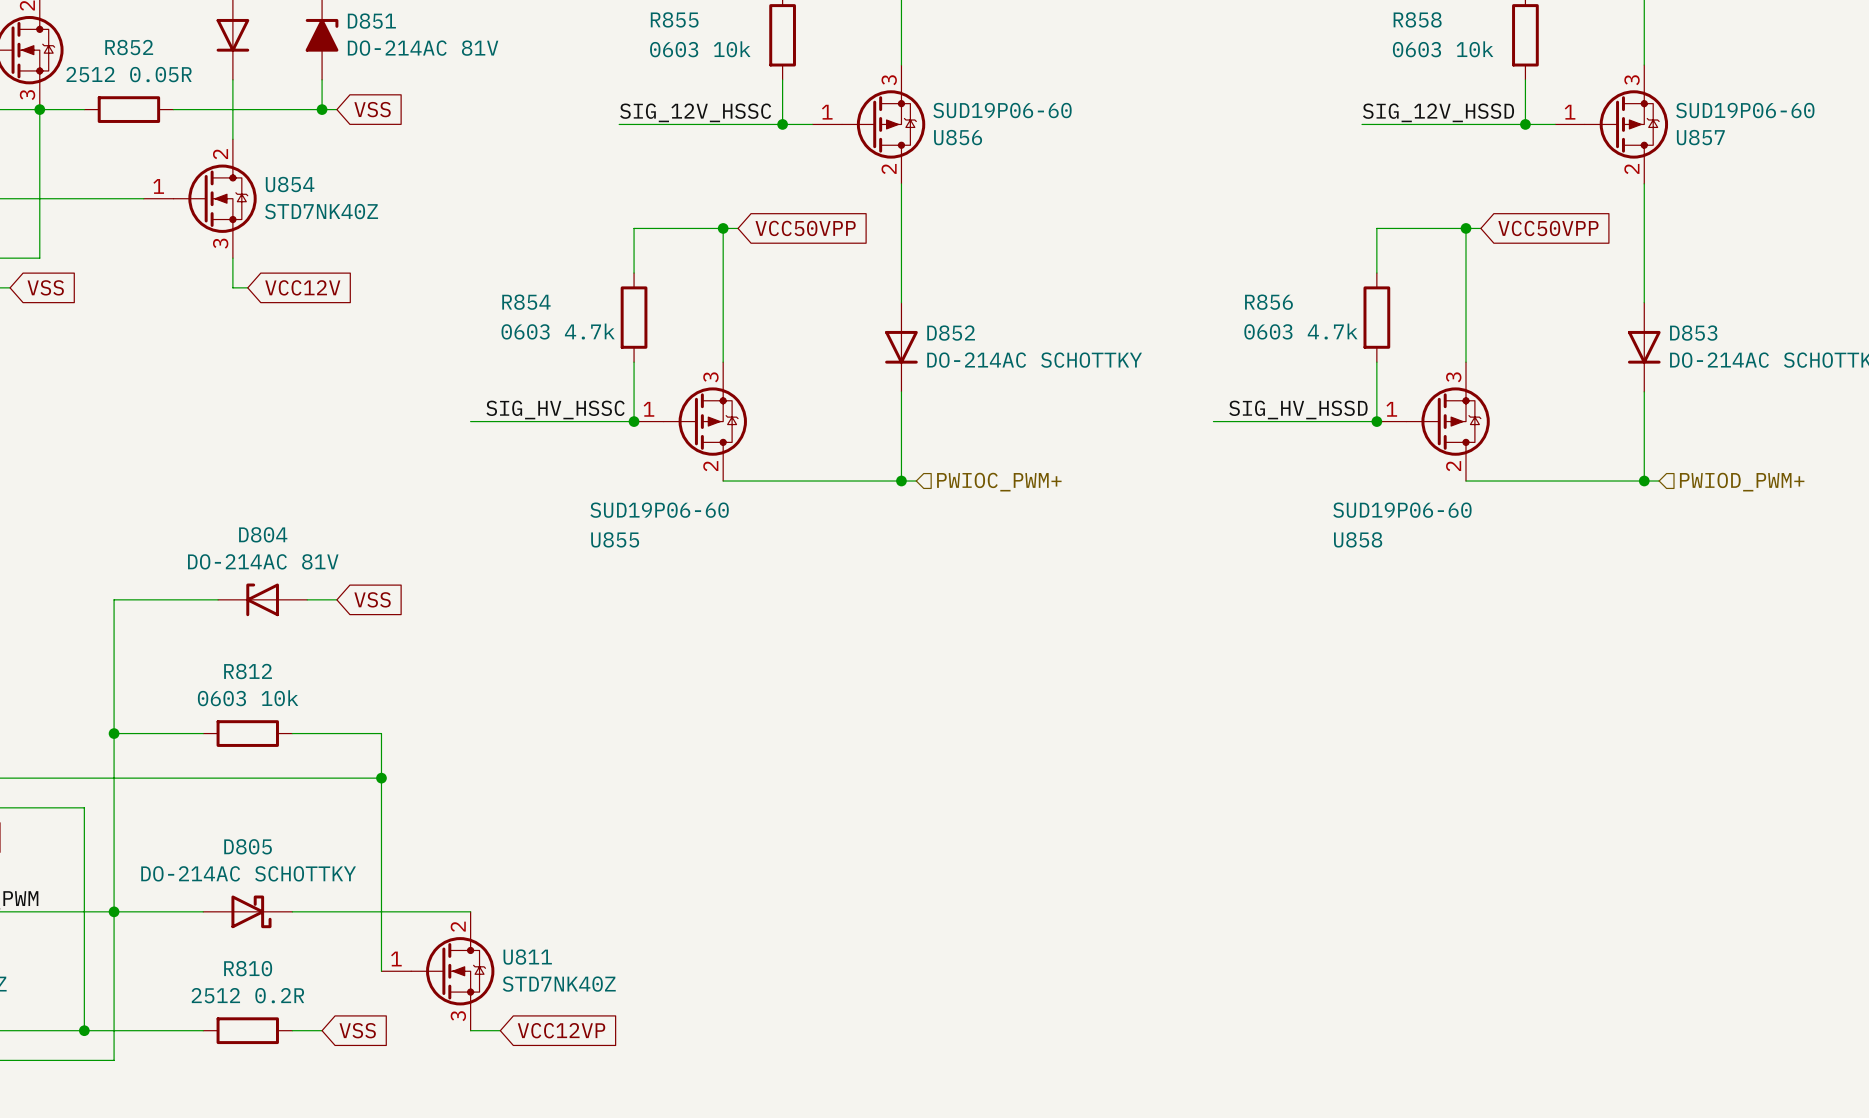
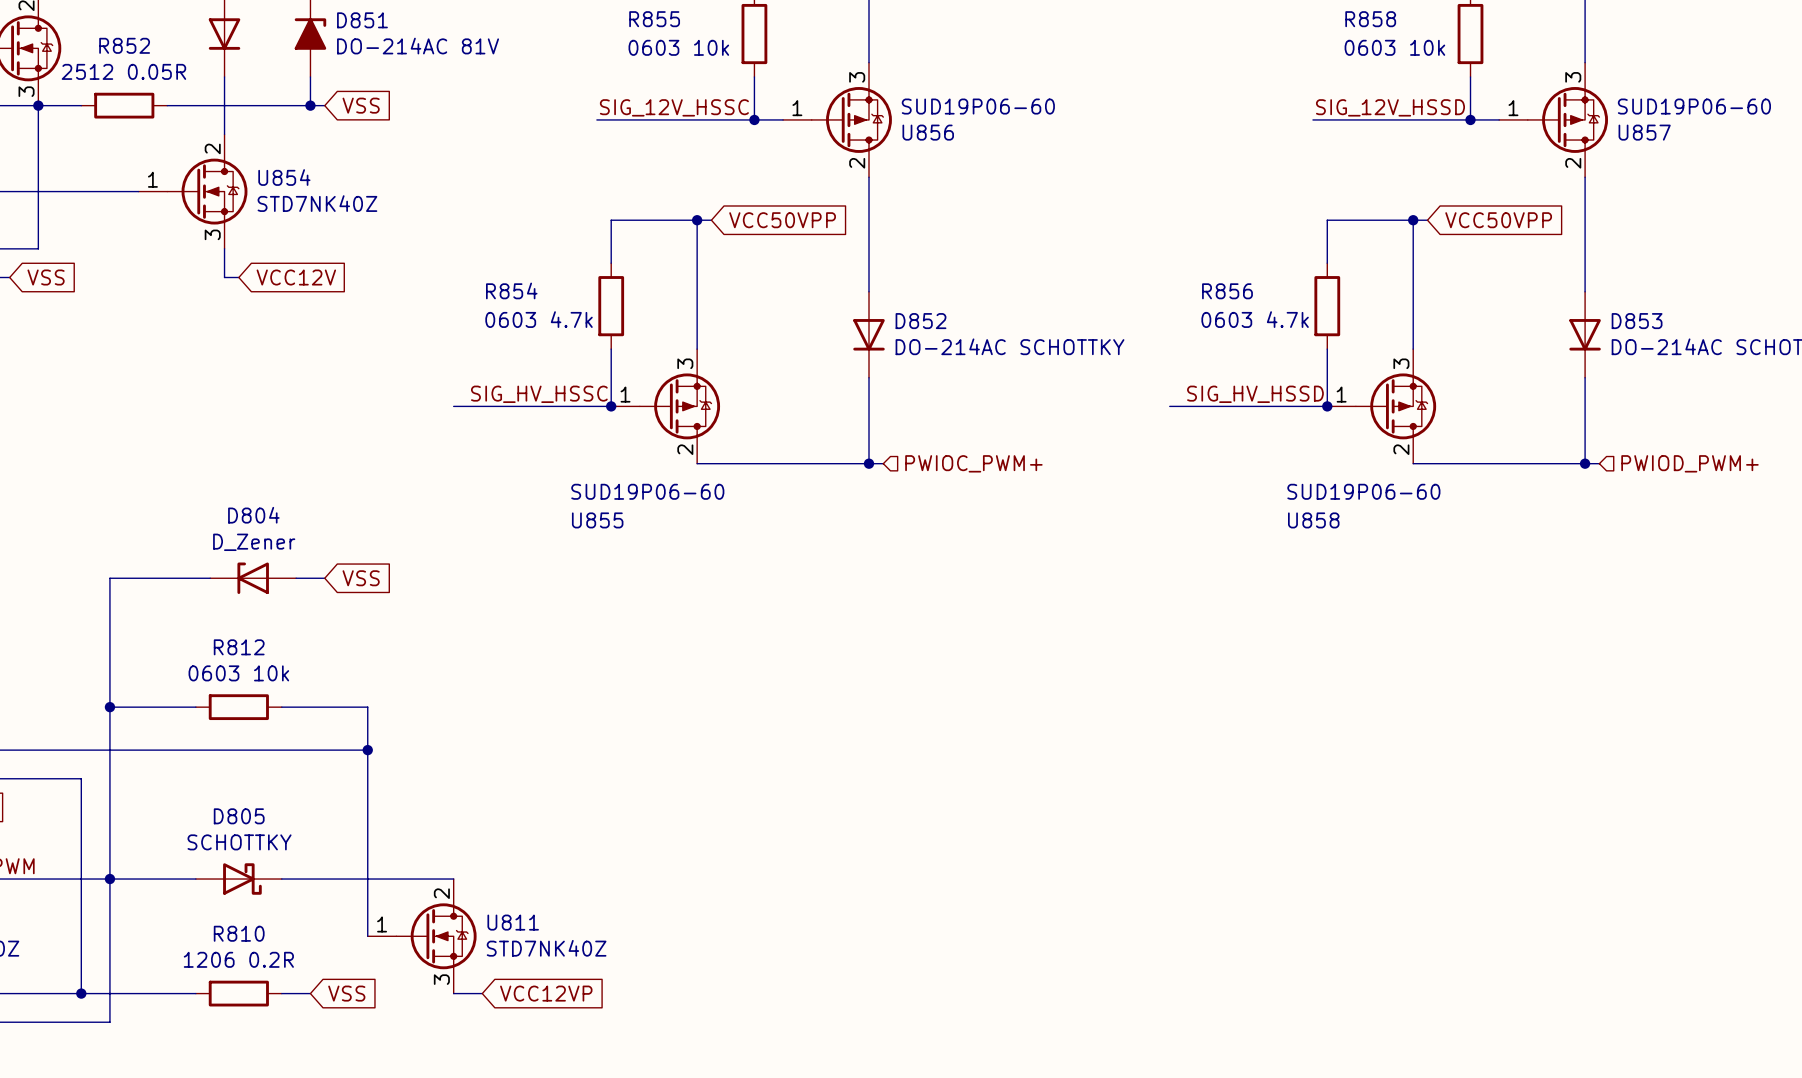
D804 value: DO-214AC 81V (263, 561) -> D_Zener (254, 542)
D805 value: DO-214AC SCHOTTKY (248, 873) -> SCHOTTKY (239, 842)
R810 value: 2512 0.2R (247, 995) -> 1206 0.2R (238, 959)

